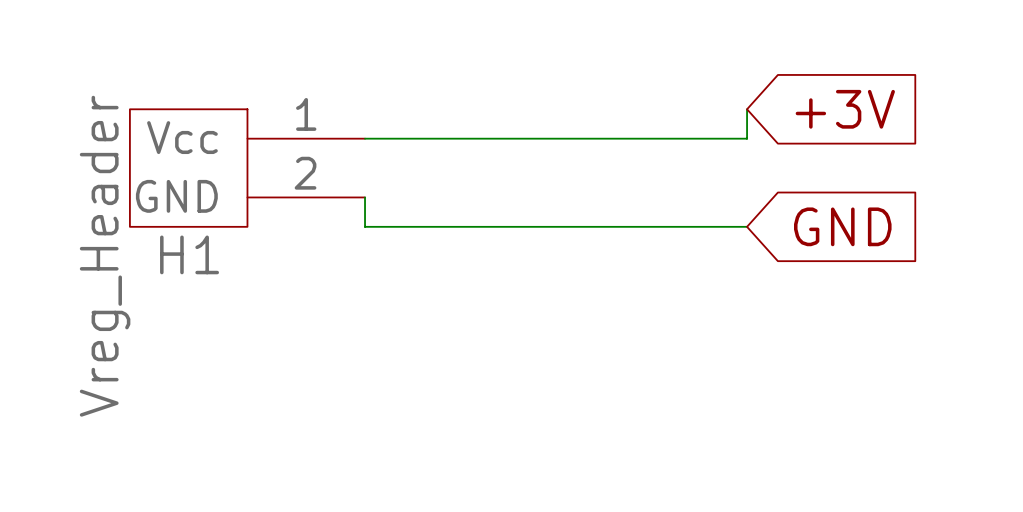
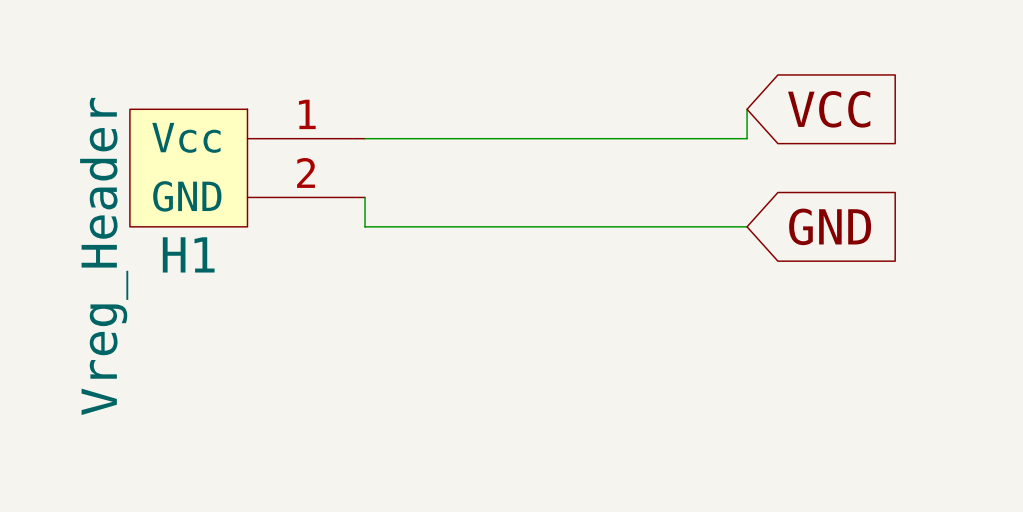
global label: +3V (845, 109) -> VCC (829, 109)

